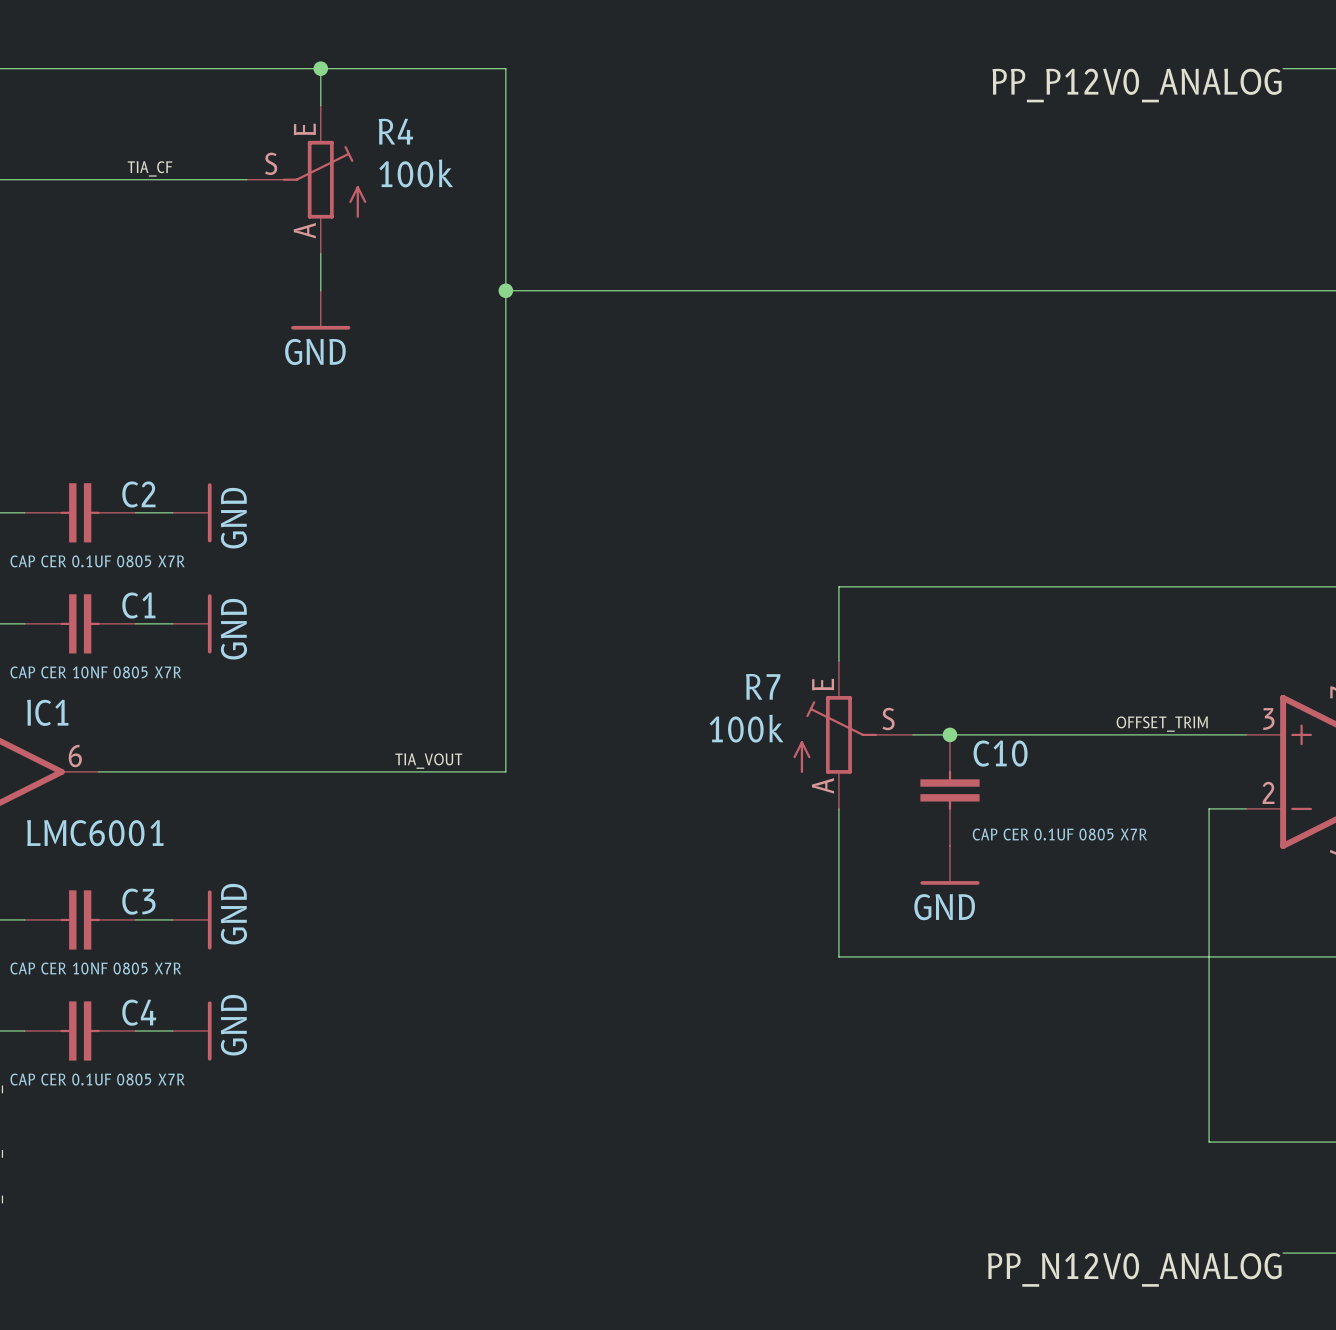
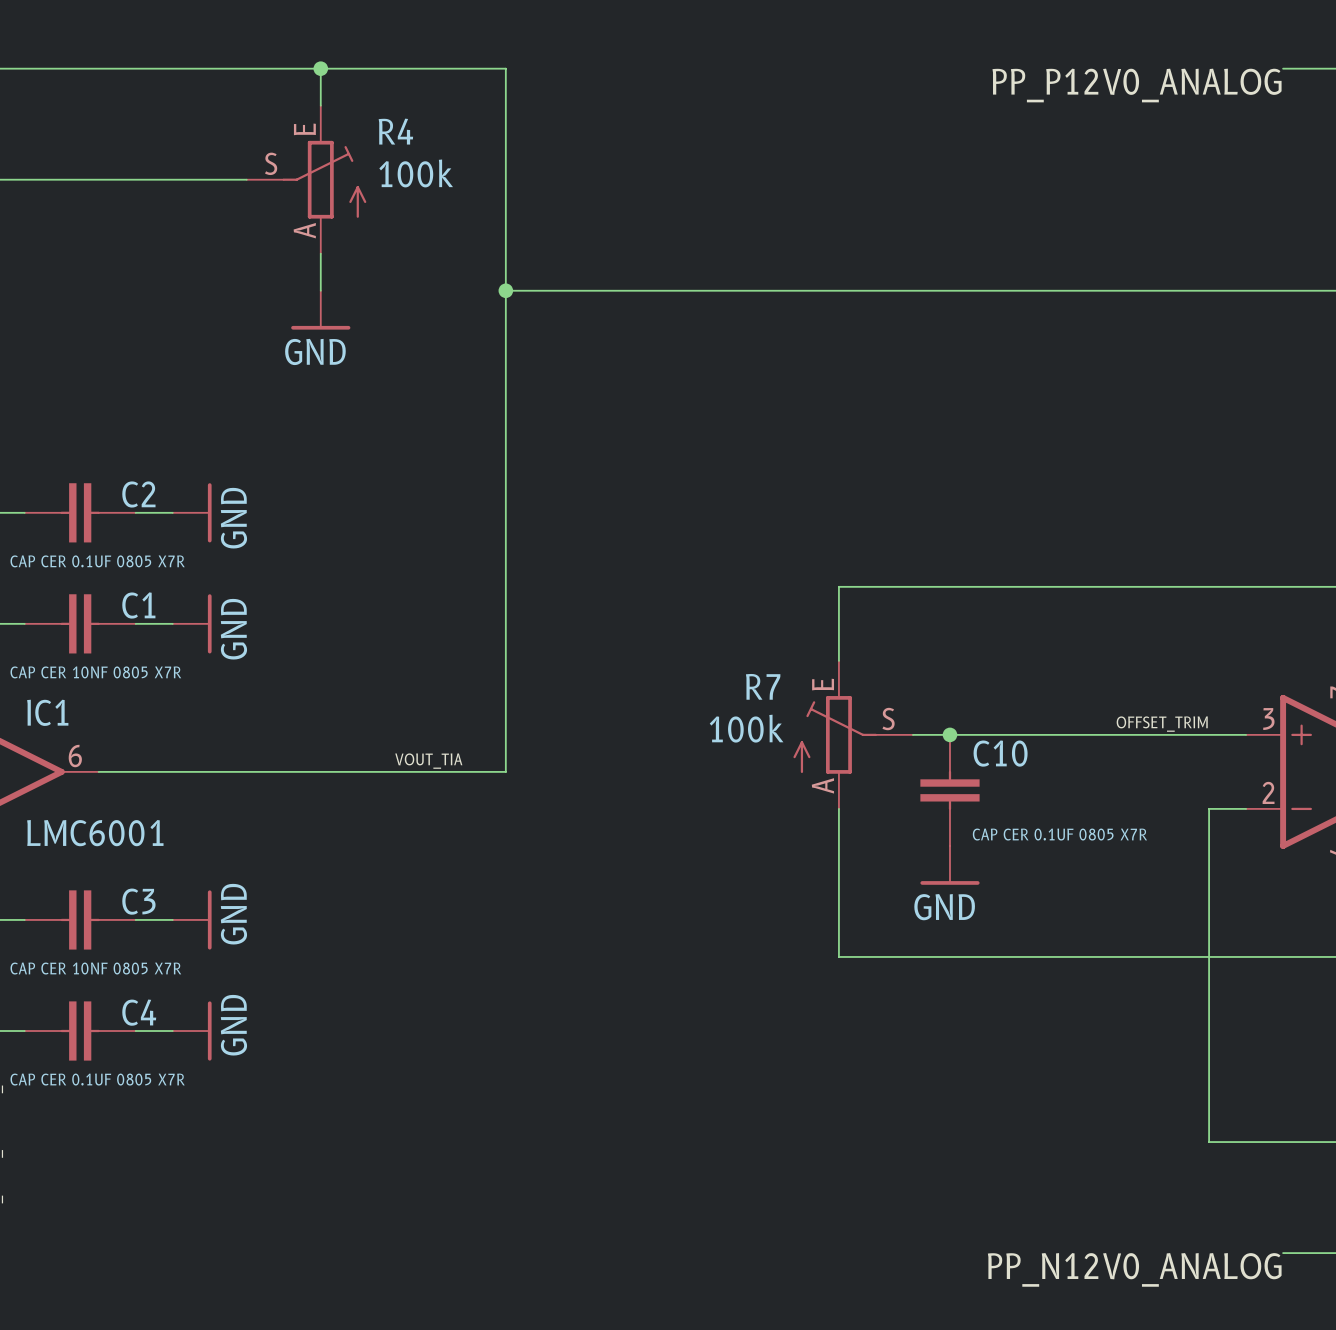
label: TIA_CF (150, 168) -> none
label: TIA_VOUT (428, 761) -> VOUT_TIA (428, 761)

